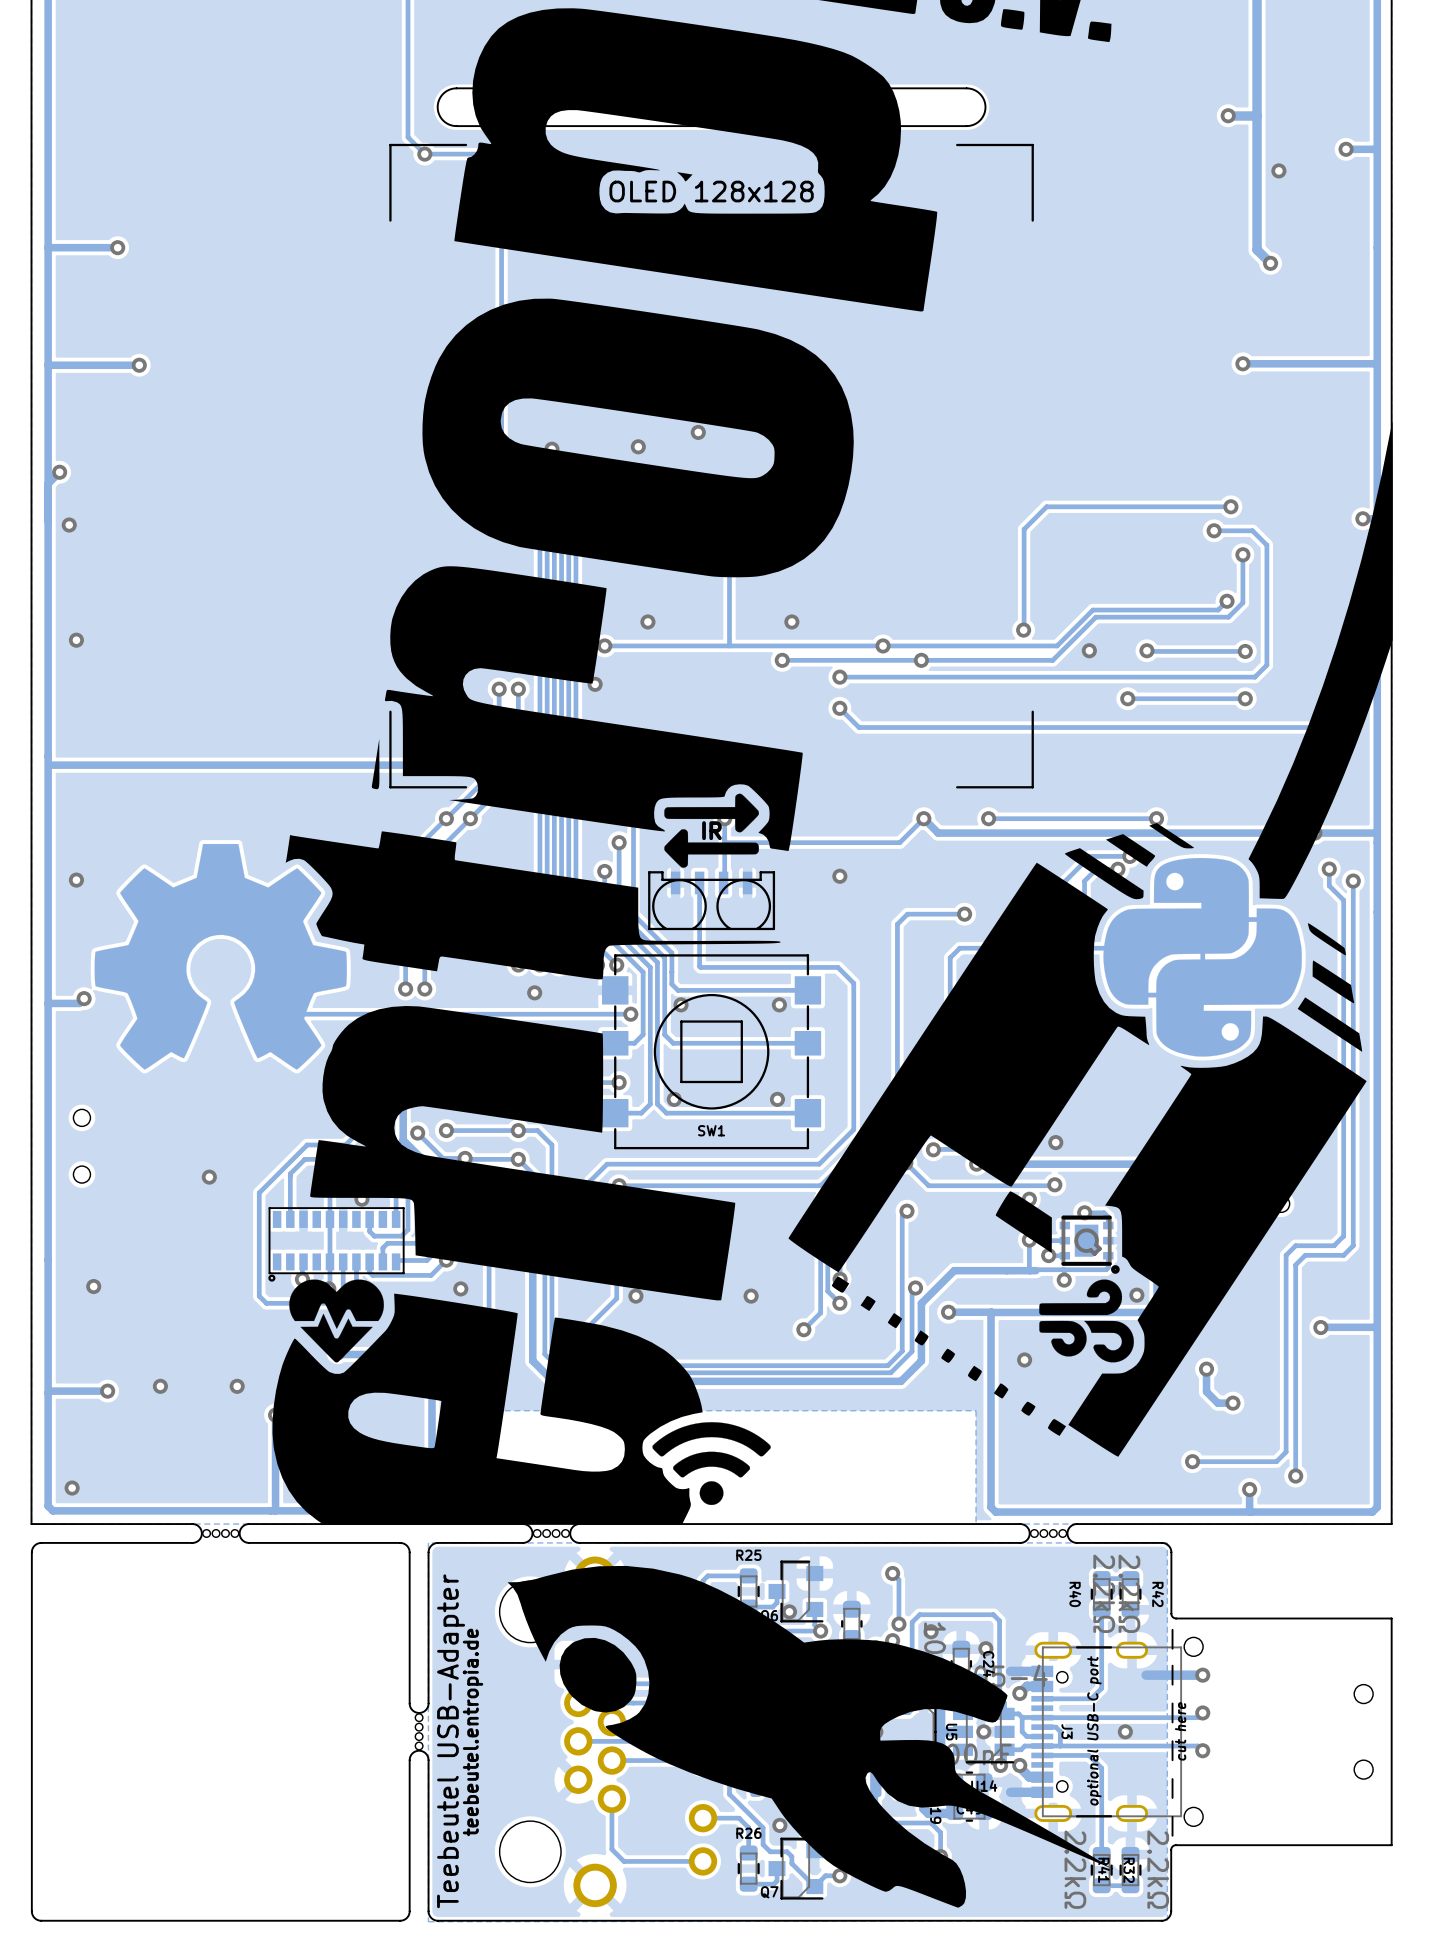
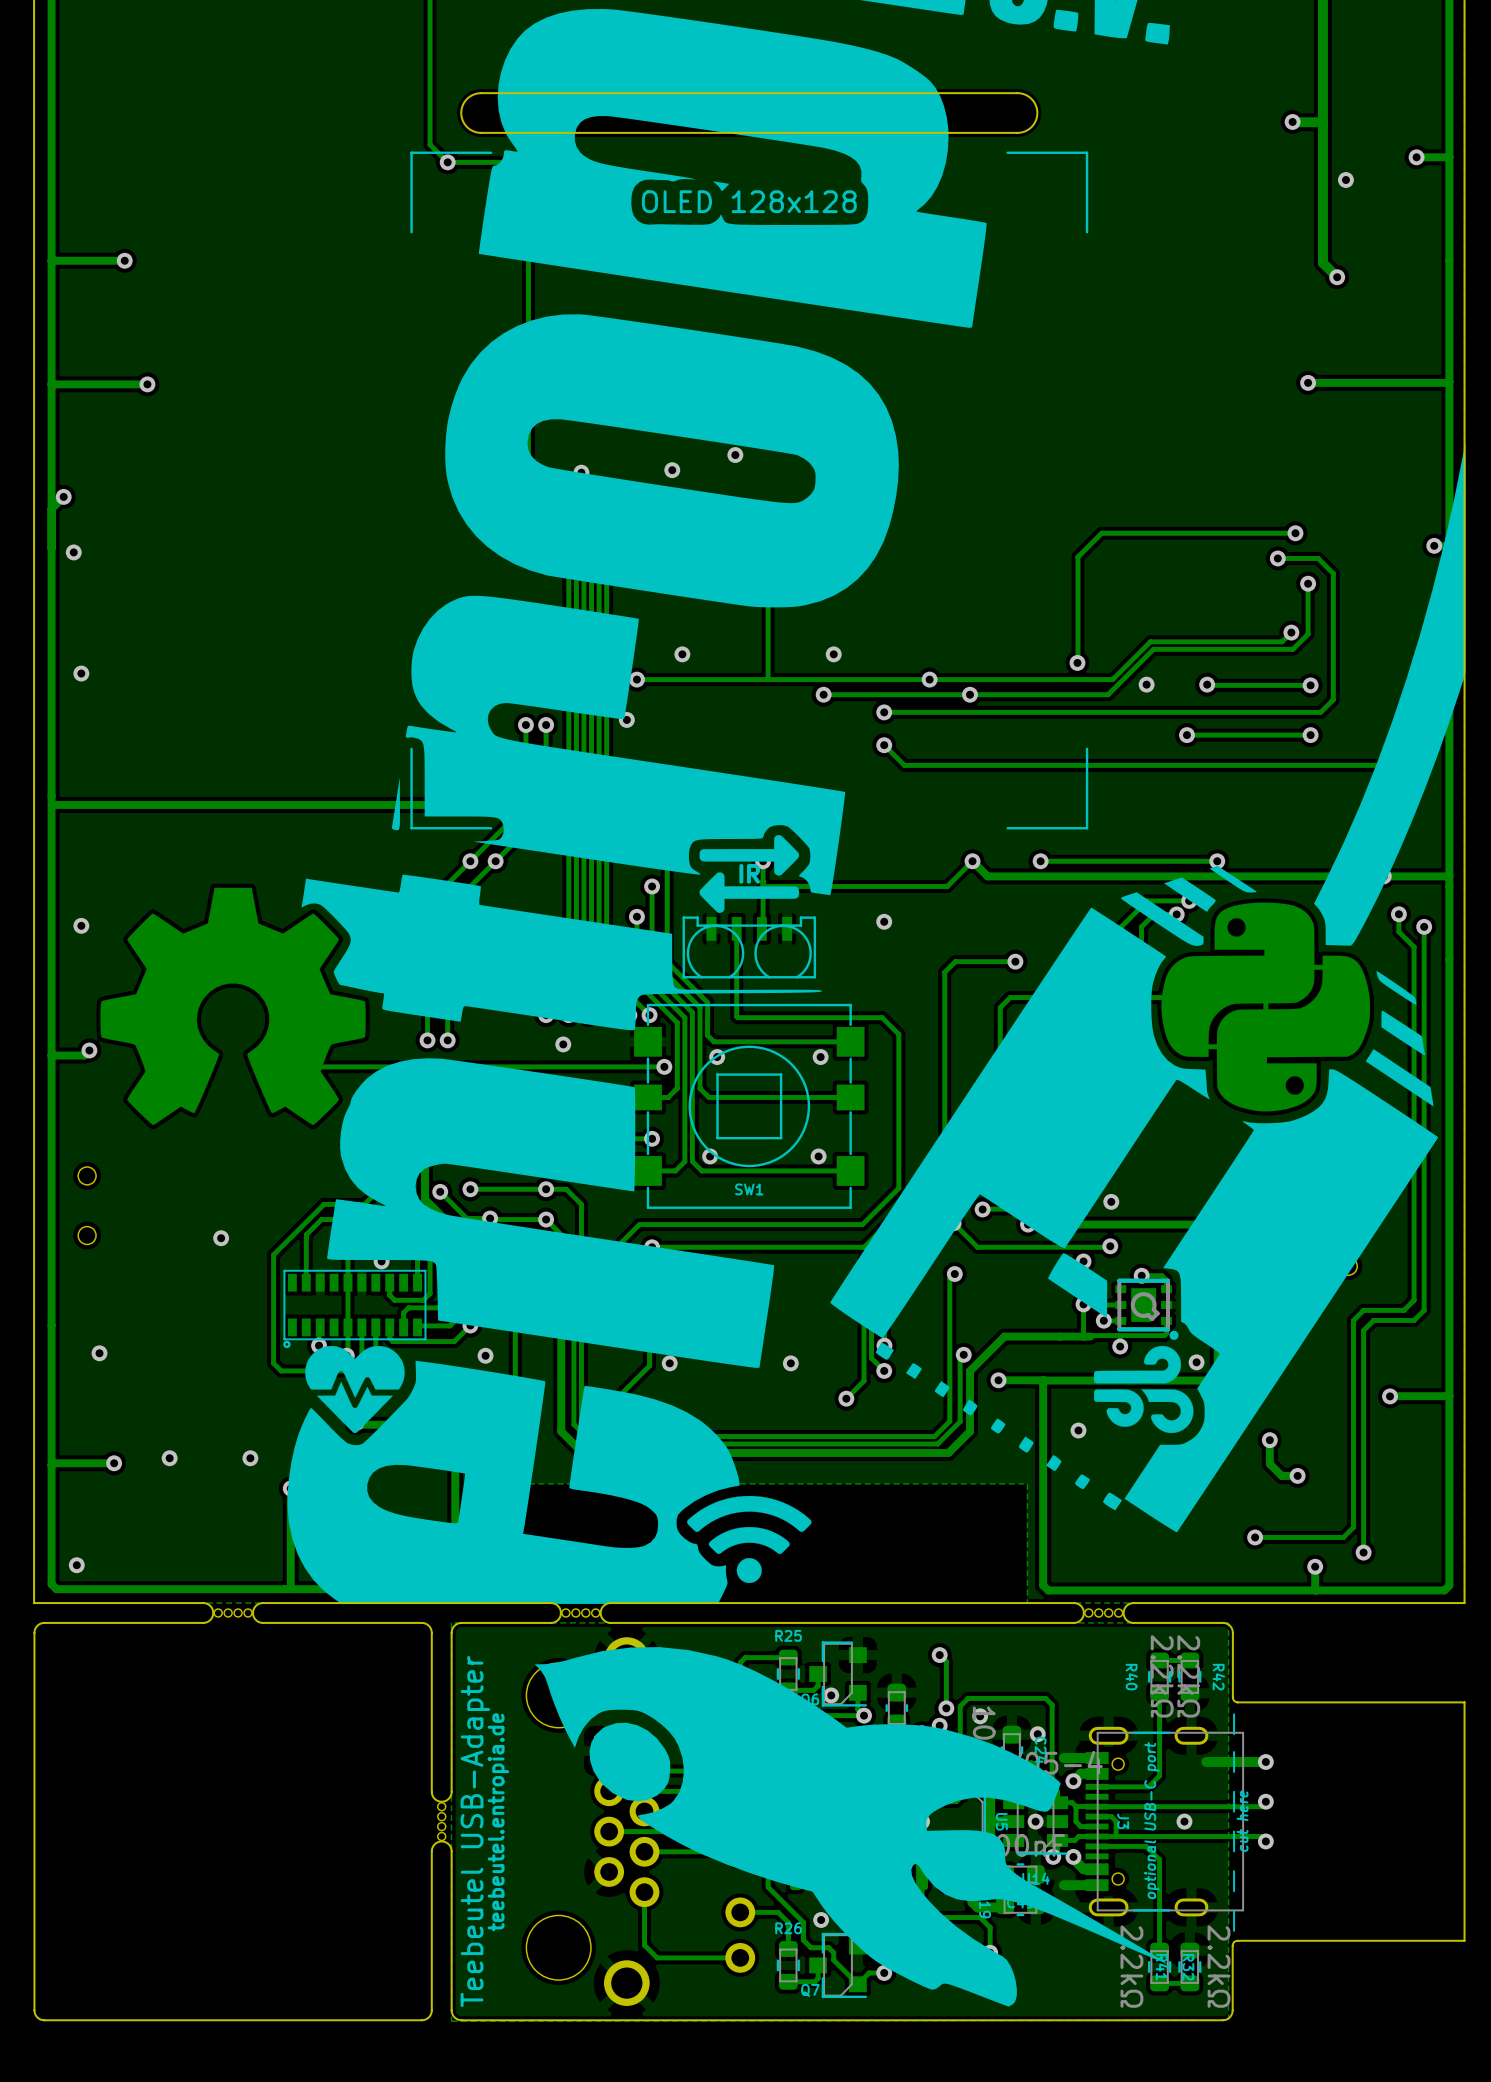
round board edge: [1183, 1636, 1204, 1657] -> none
round board edge: [1353, 1684, 1374, 1704] -> none
round board edge: [1353, 1759, 1374, 1780] -> none
round board edge: [1183, 1806, 1204, 1827] -> none

